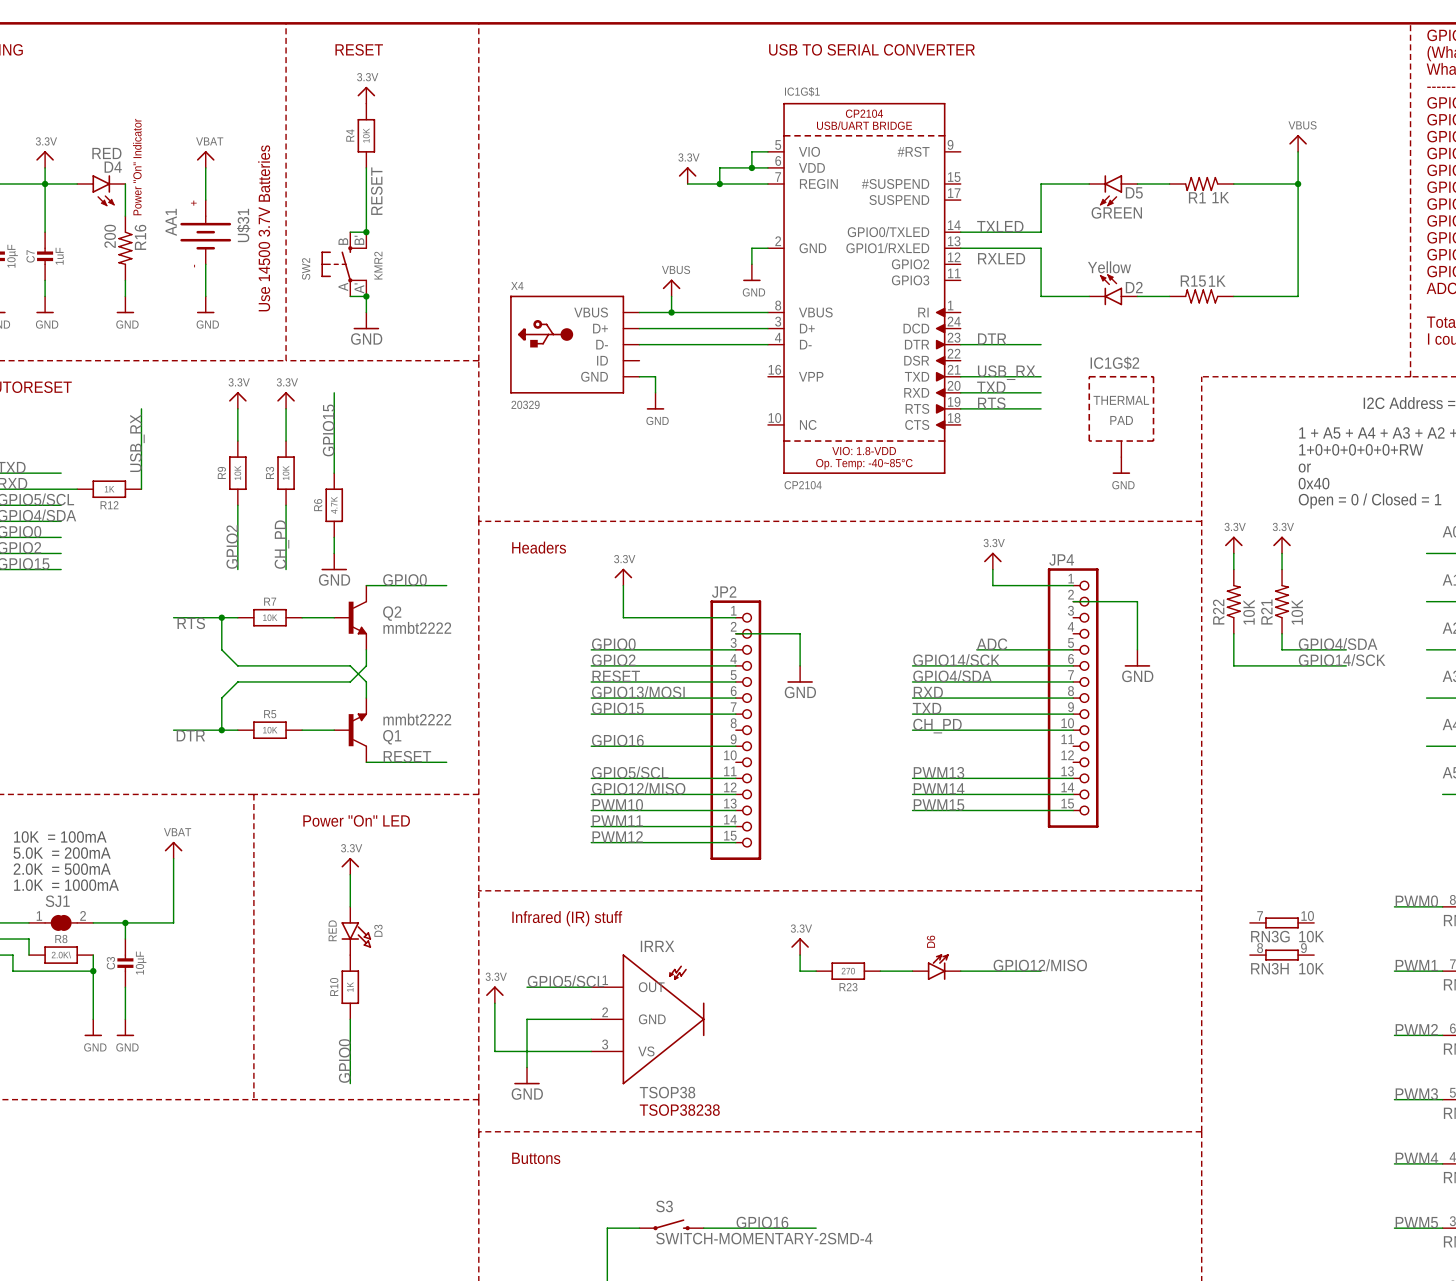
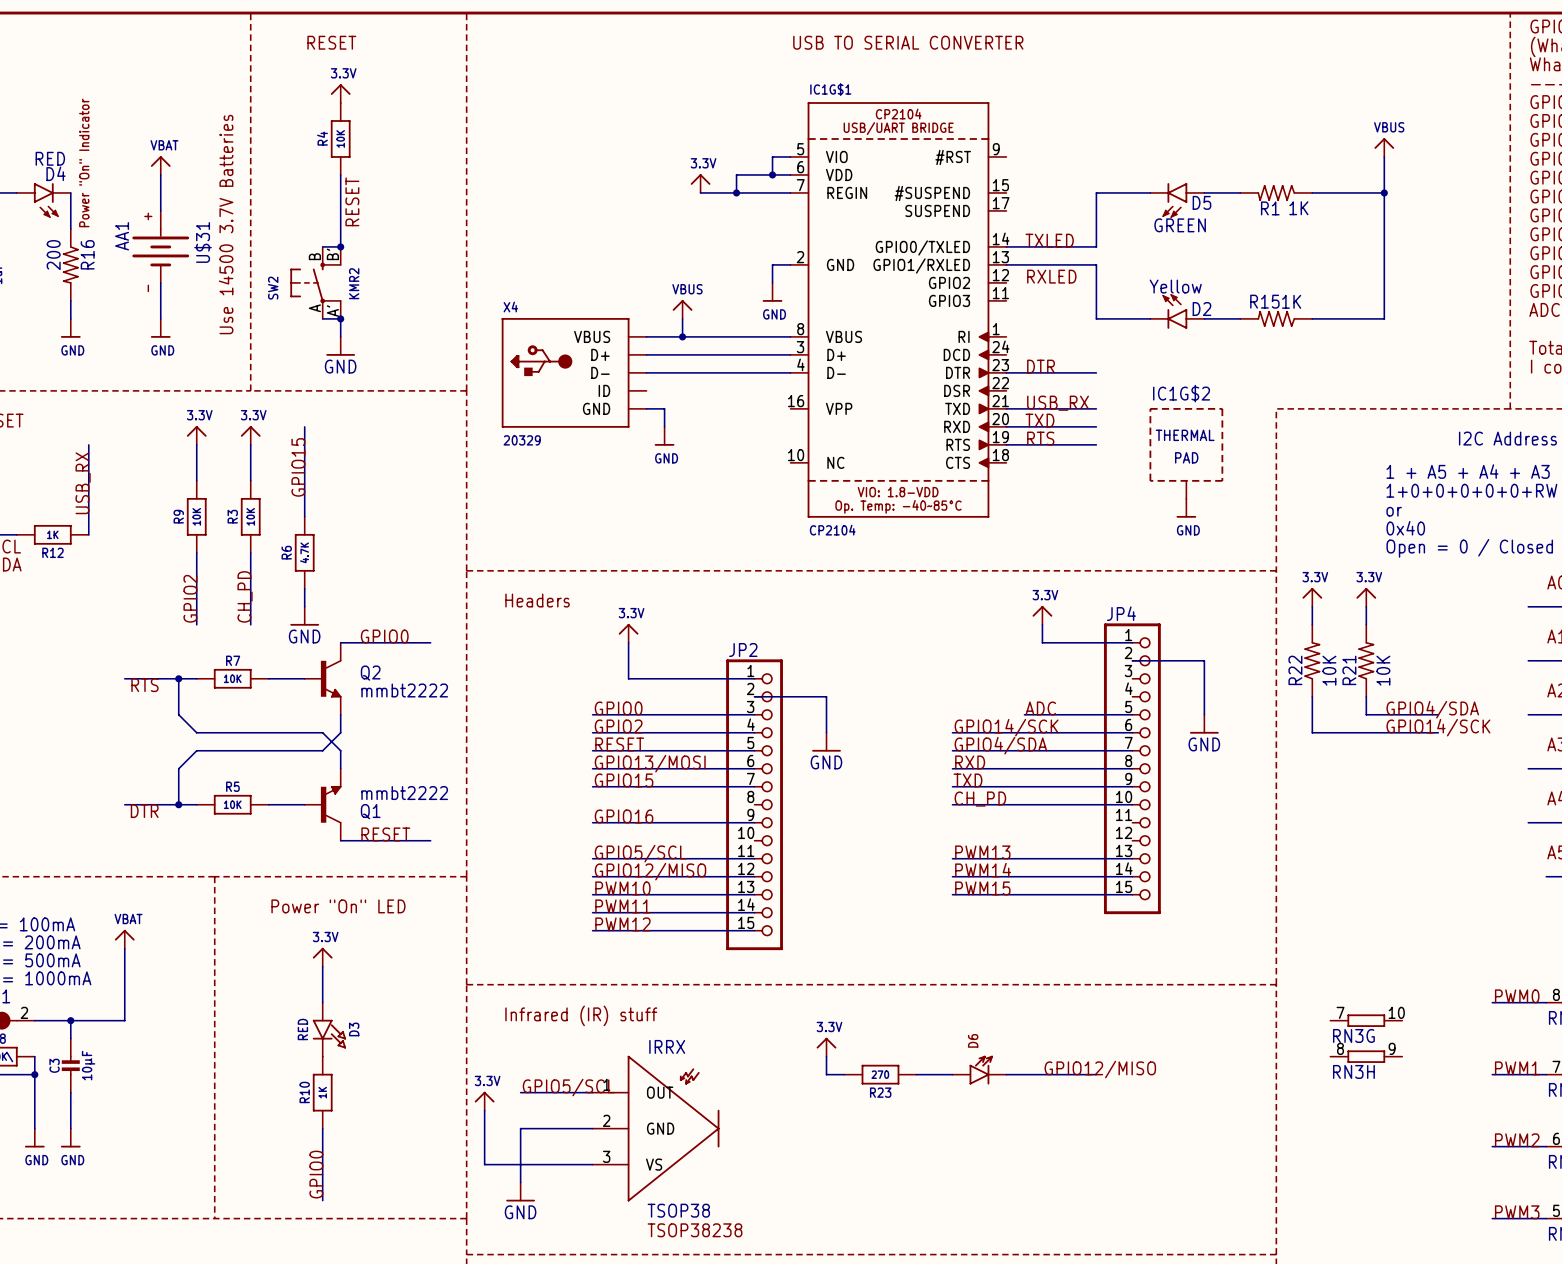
RN3G value: 10K (1311, 936) -> none
RN3H value: 10K (1311, 968) -> none

